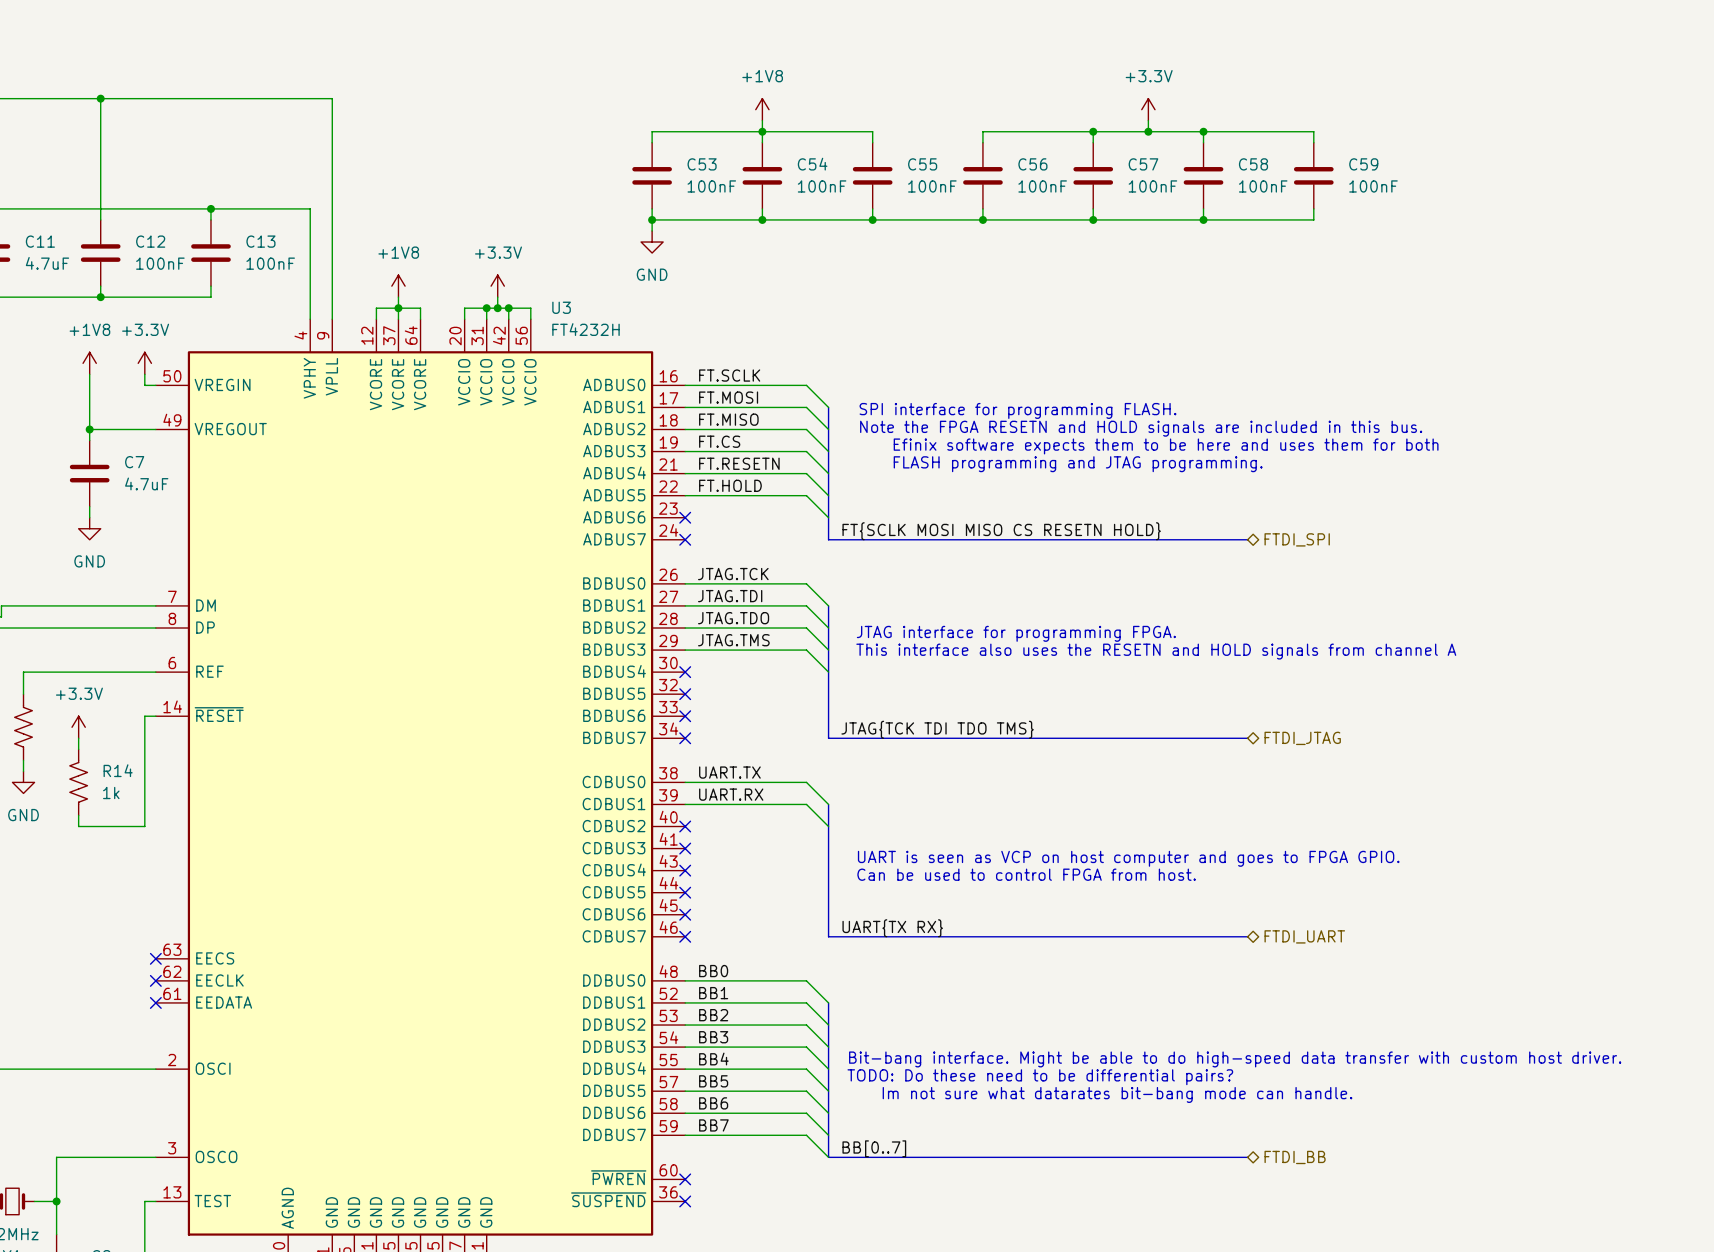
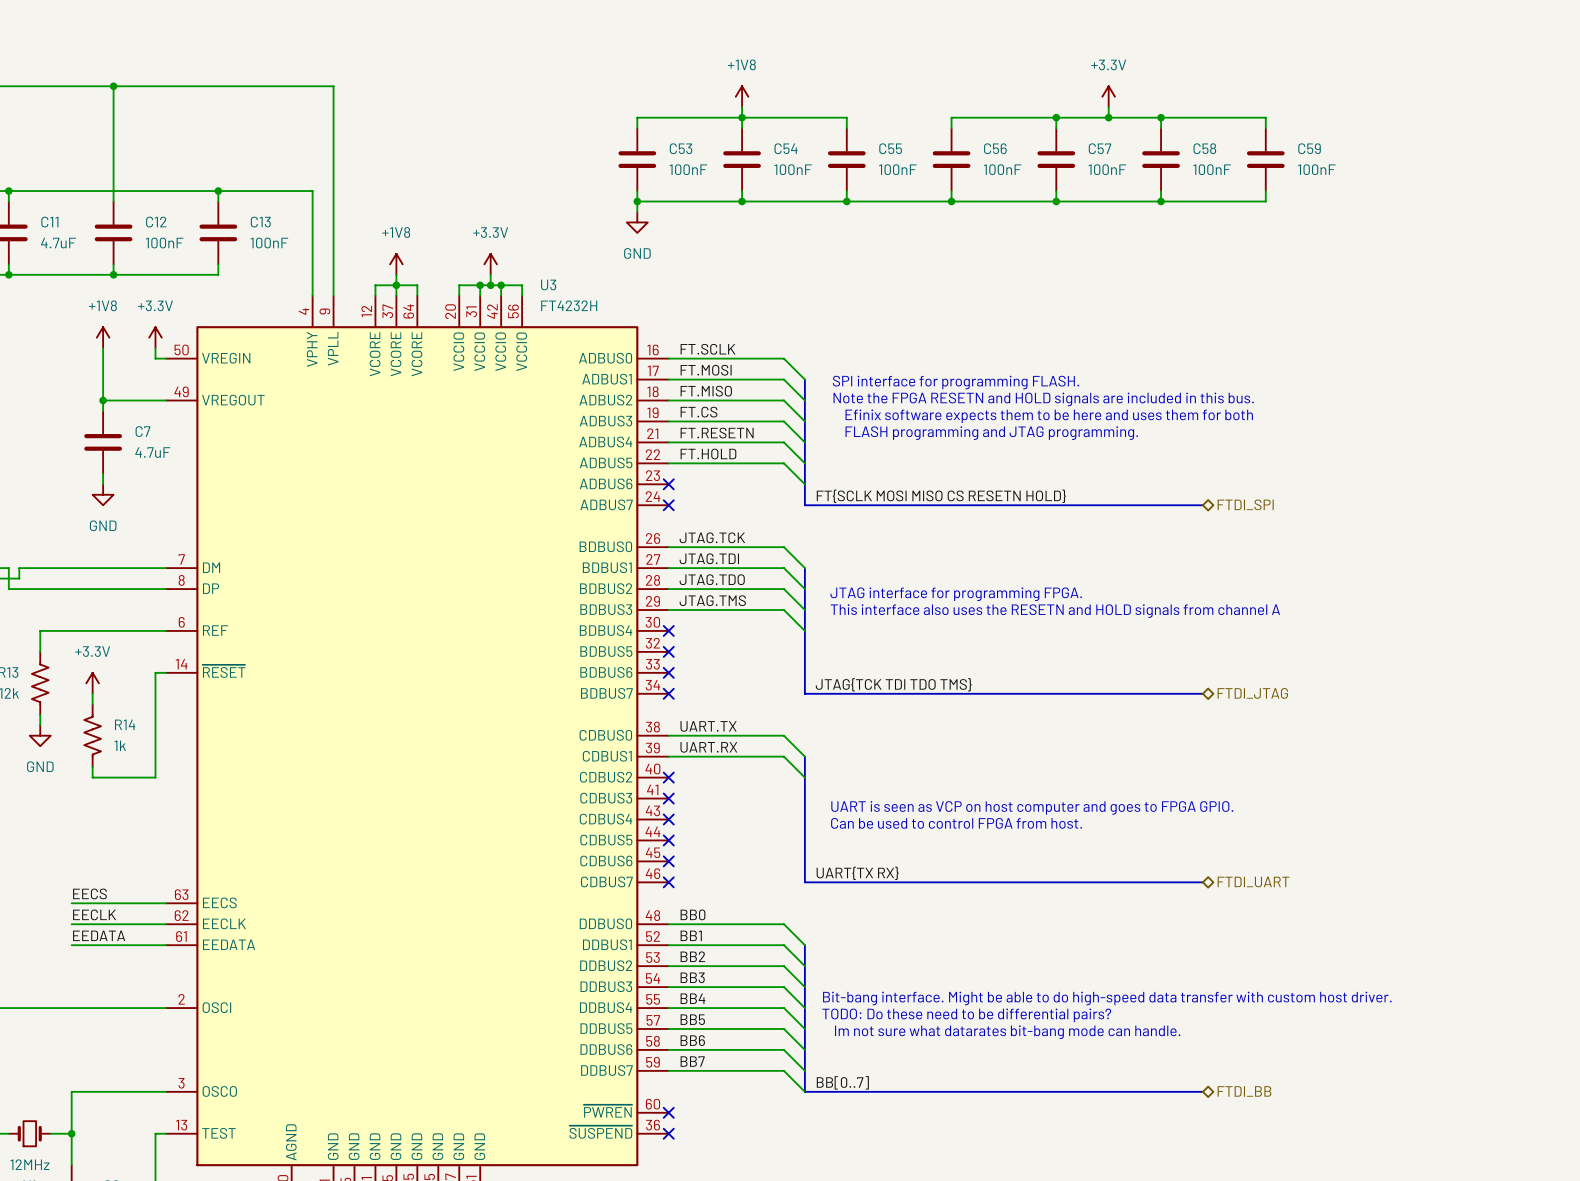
label: none -> EECS (89, 893)
wire: none -> (71, 903) (165, 903)
no-connect mark: (155, 958) -> none
label: none -> EECLK (94, 914)
wire: none -> (71, 924) (165, 924)
no-connect mark: (155, 980) -> none
label: none -> EEDATA (99, 935)
wire: none -> (71, 945) (165, 945)
no-connect mark: (155, 1002) -> none

